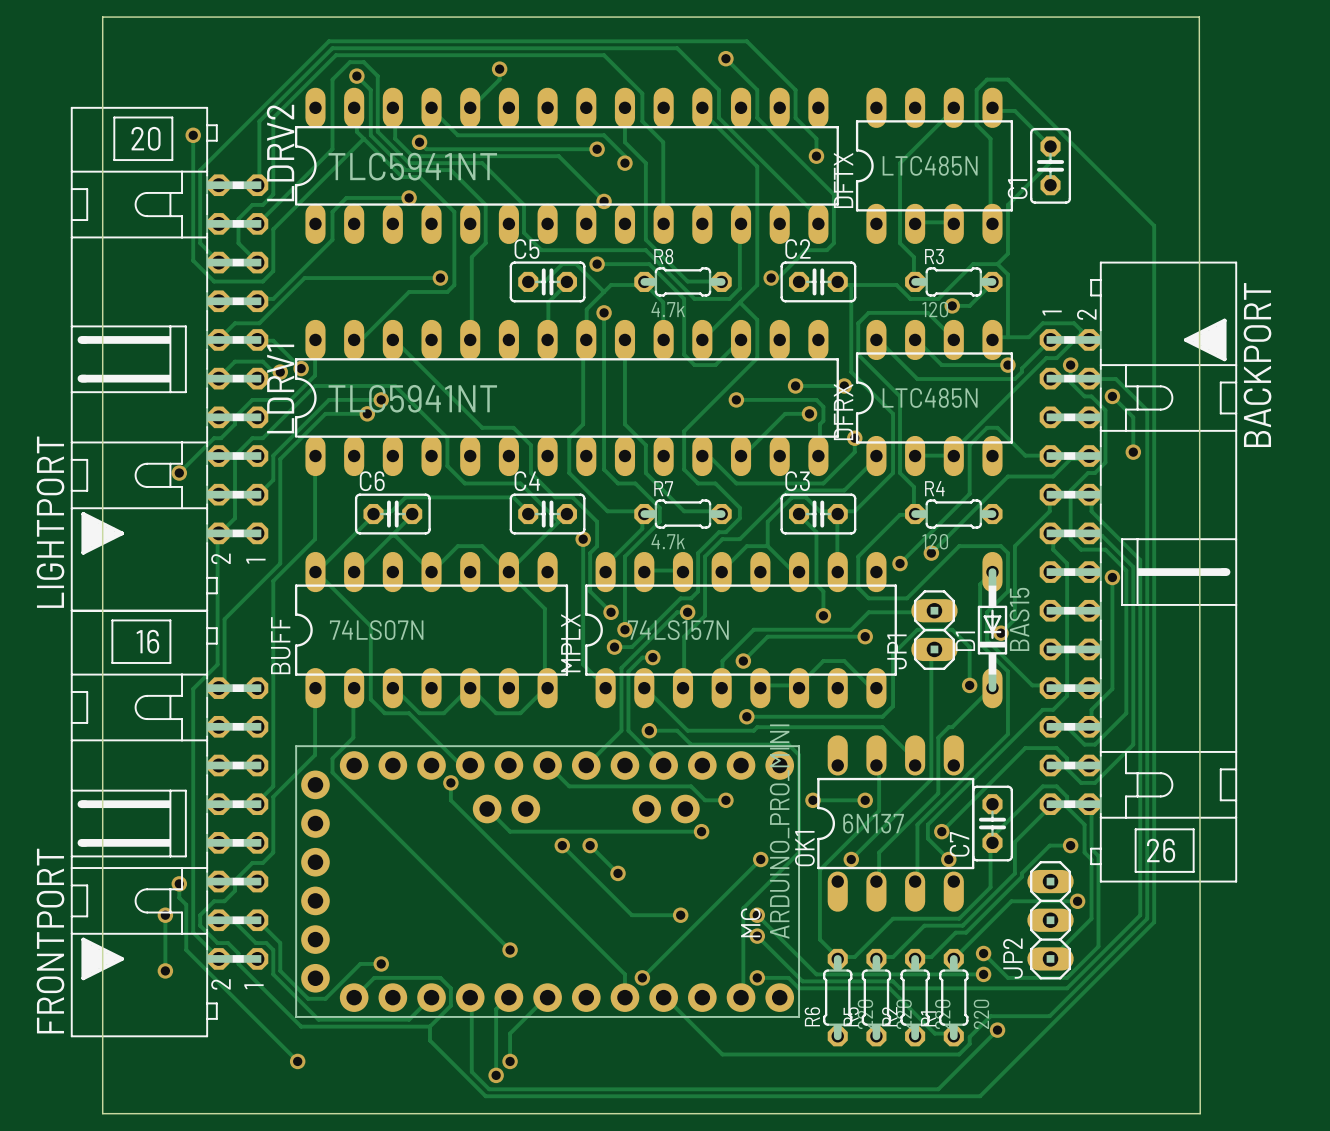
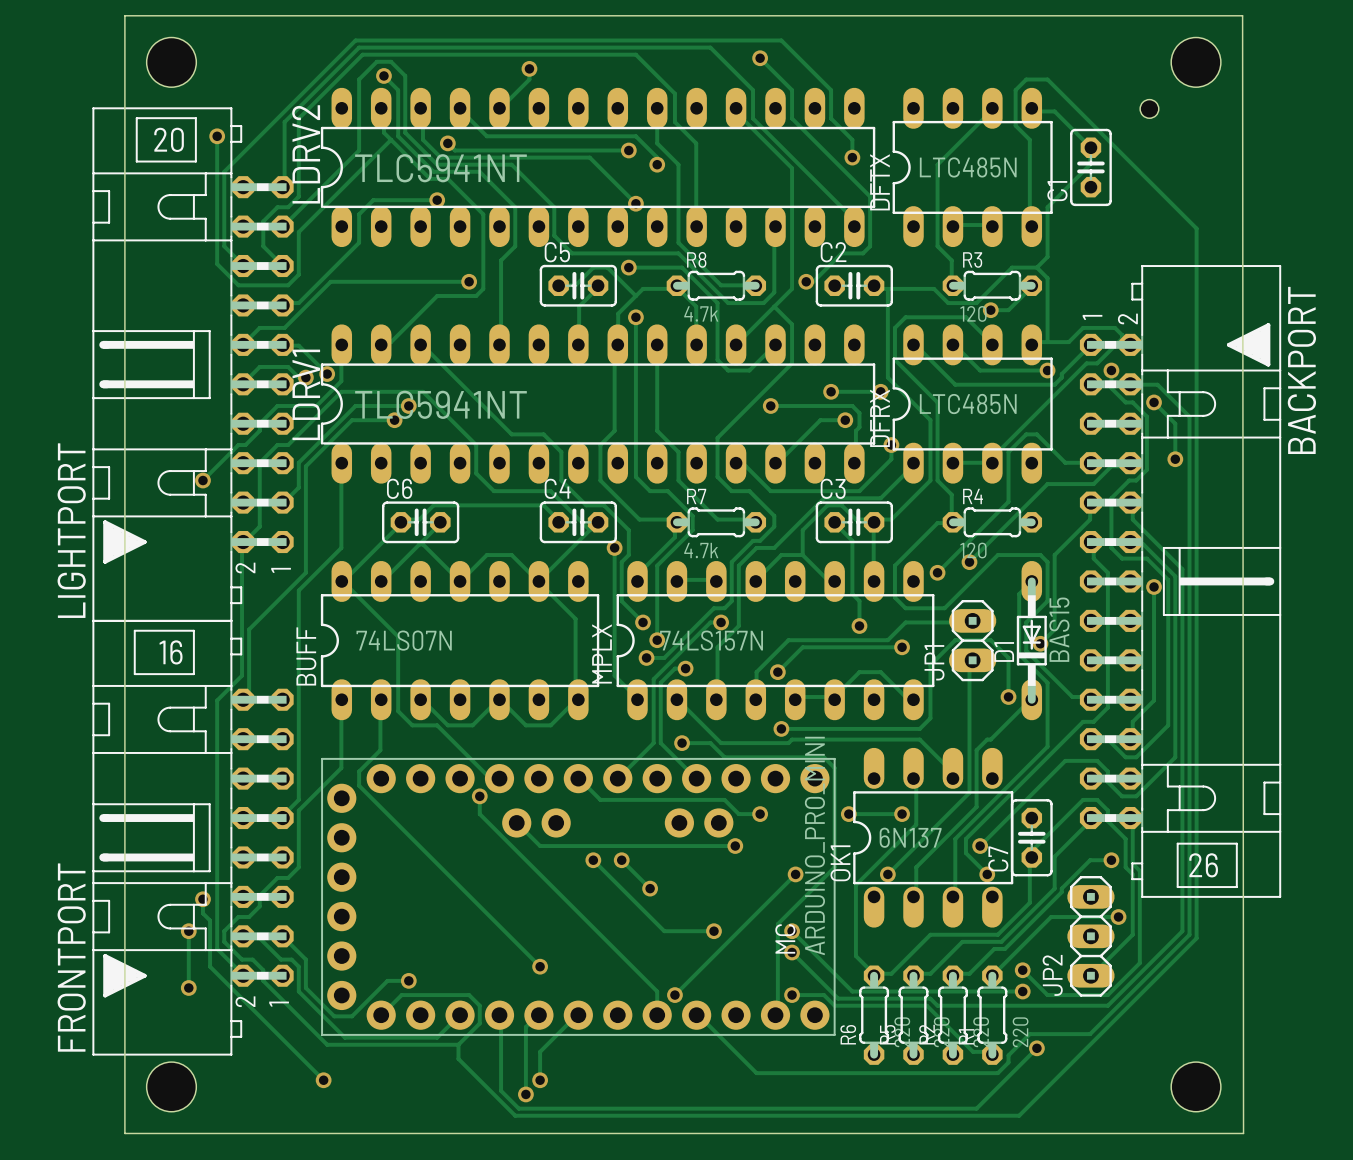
hole: none -> (171, 62)
hole: none -> (1196, 62)
hole: none -> (1149, 108)
hole: none -> (171, 1086)
hole: none -> (1196, 1086)

